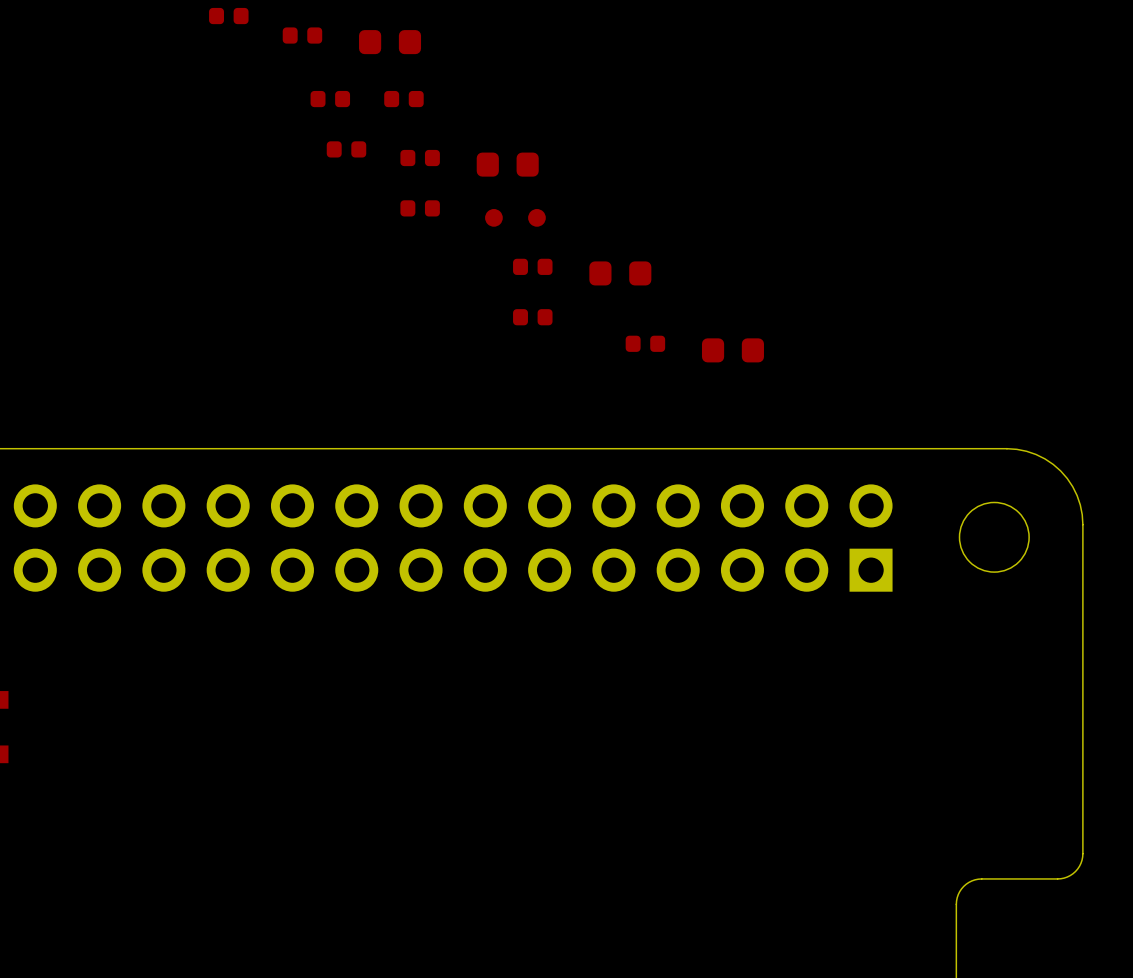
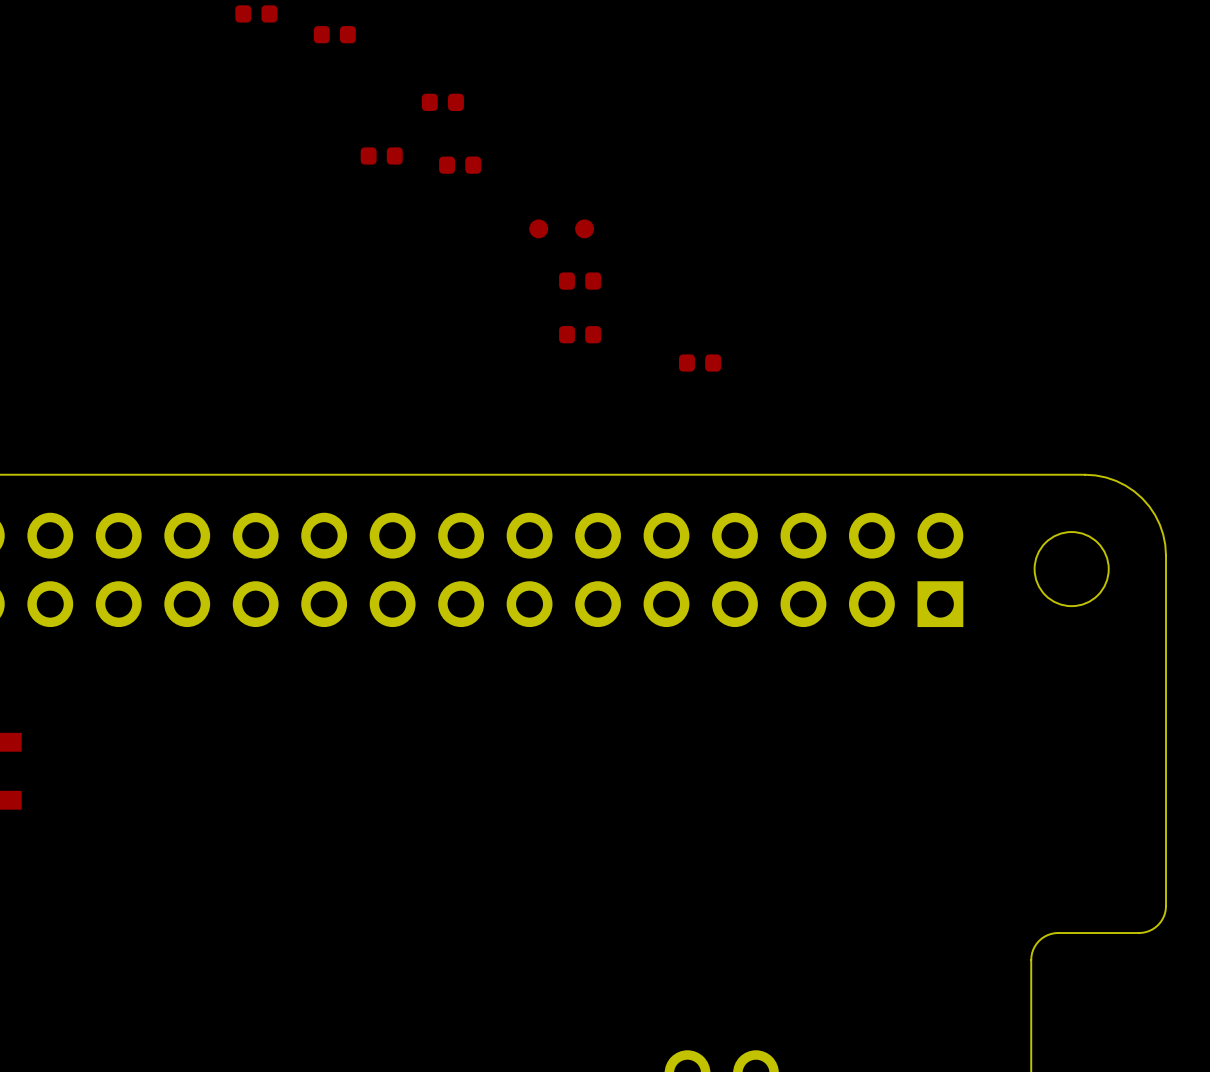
part: (390, 42) -> none
part: (330, 99) -> none
part: (507, 164) -> none
part: (420, 208) -> none
part: (620, 273) -> none
part: (732, 350) -> none

